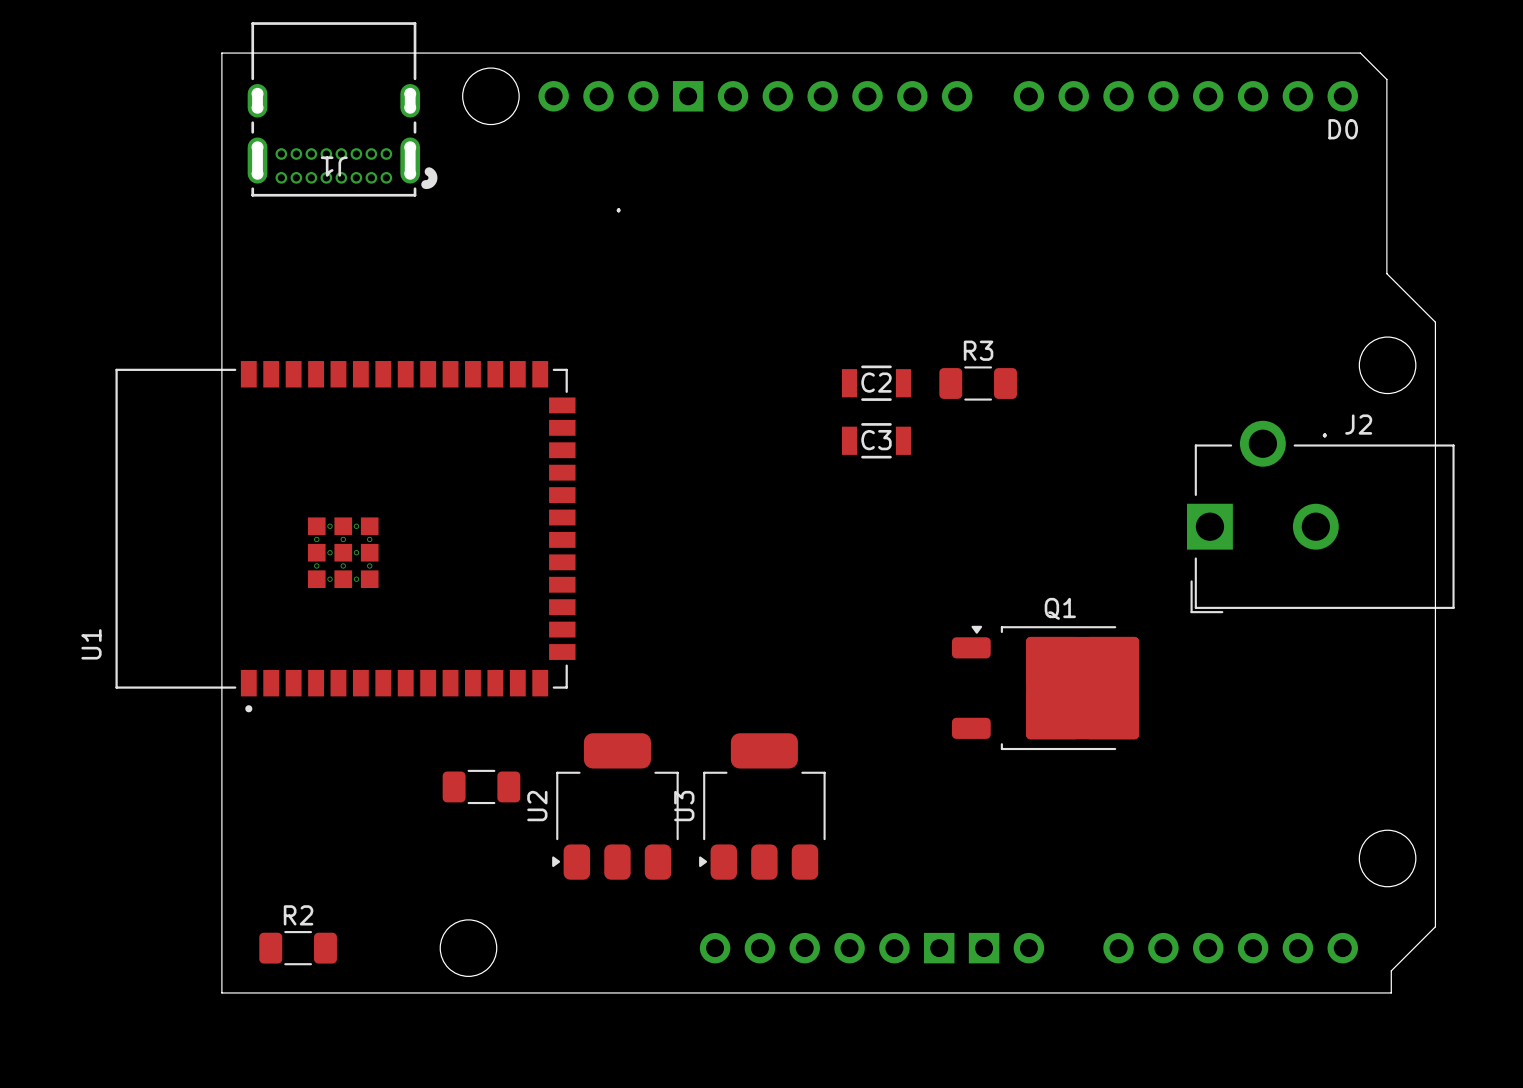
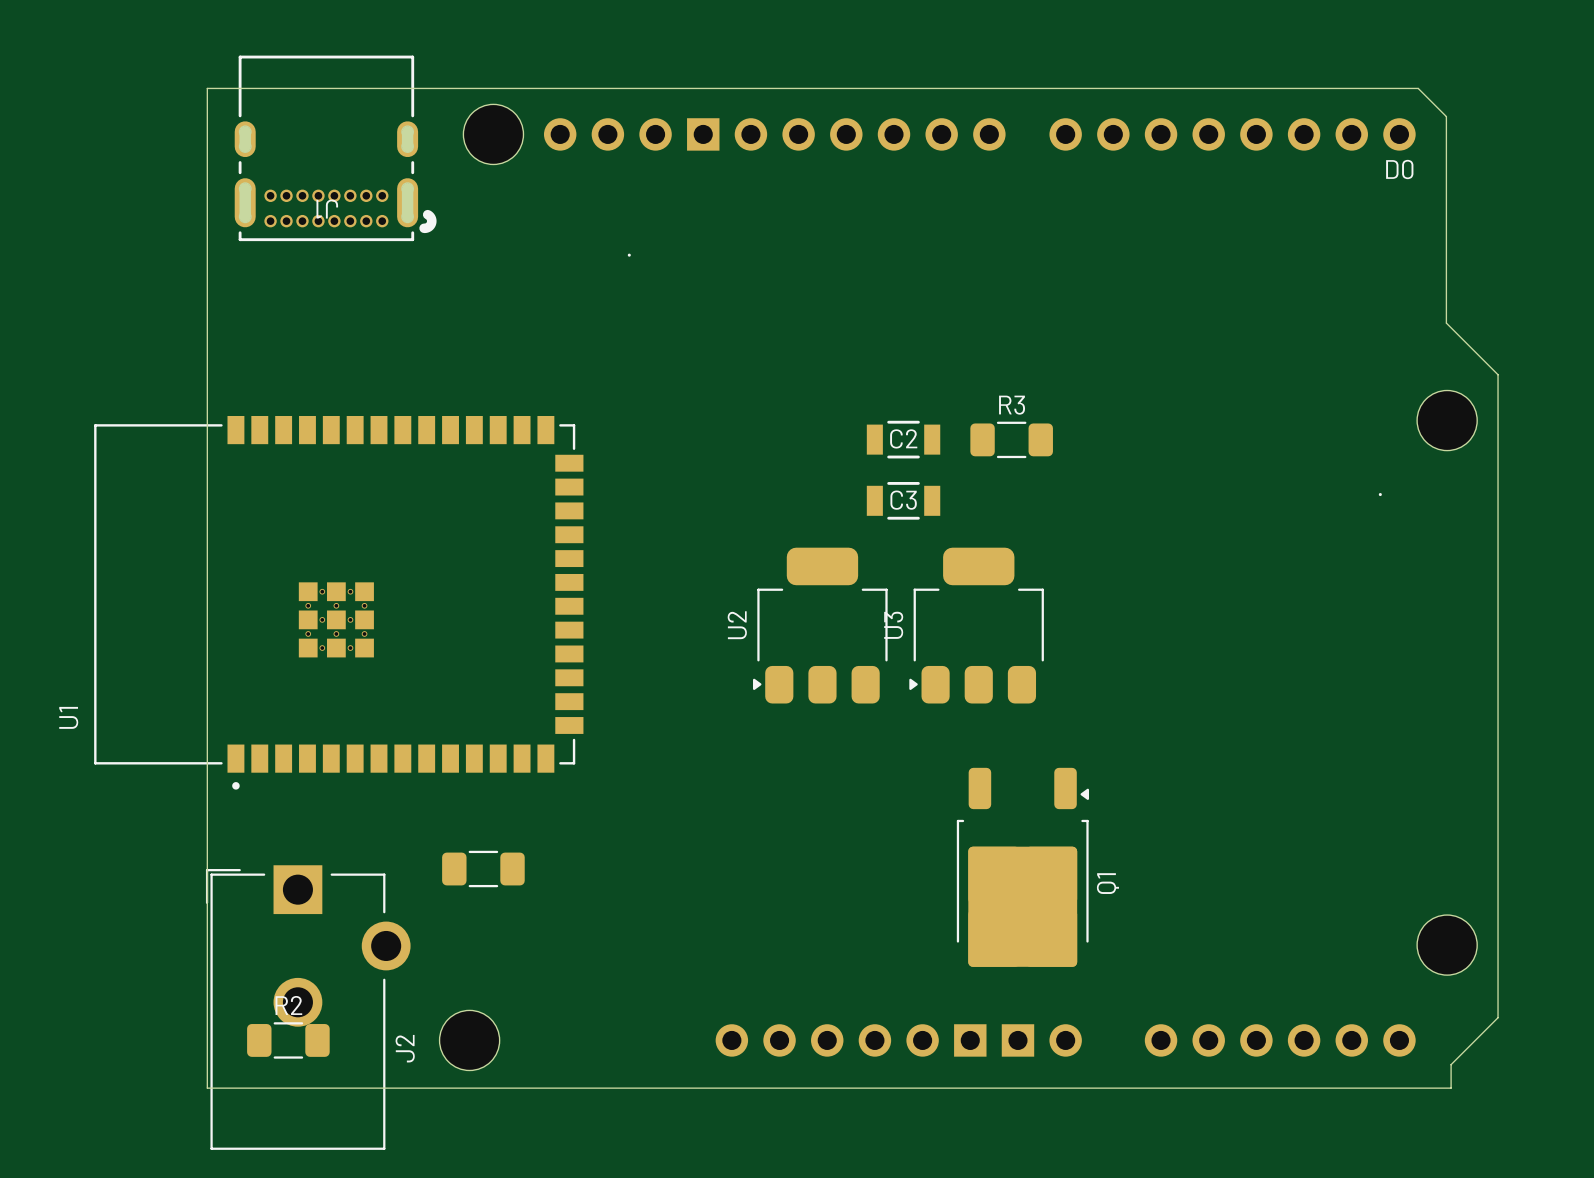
J2 rotation: 0° (1320, 516) -> 90° clockwise (308, 1007)
J2 position: (1320, 516) -> (308, 1007)
Q1 rotation: 0° (1045, 687) -> 90° clockwise (1022, 867)
Q1 position: (1045, 687) -> (1022, 867)
U2 position: (615, 806) -> (820, 625)
U3 position: (762, 806) -> (976, 625)

